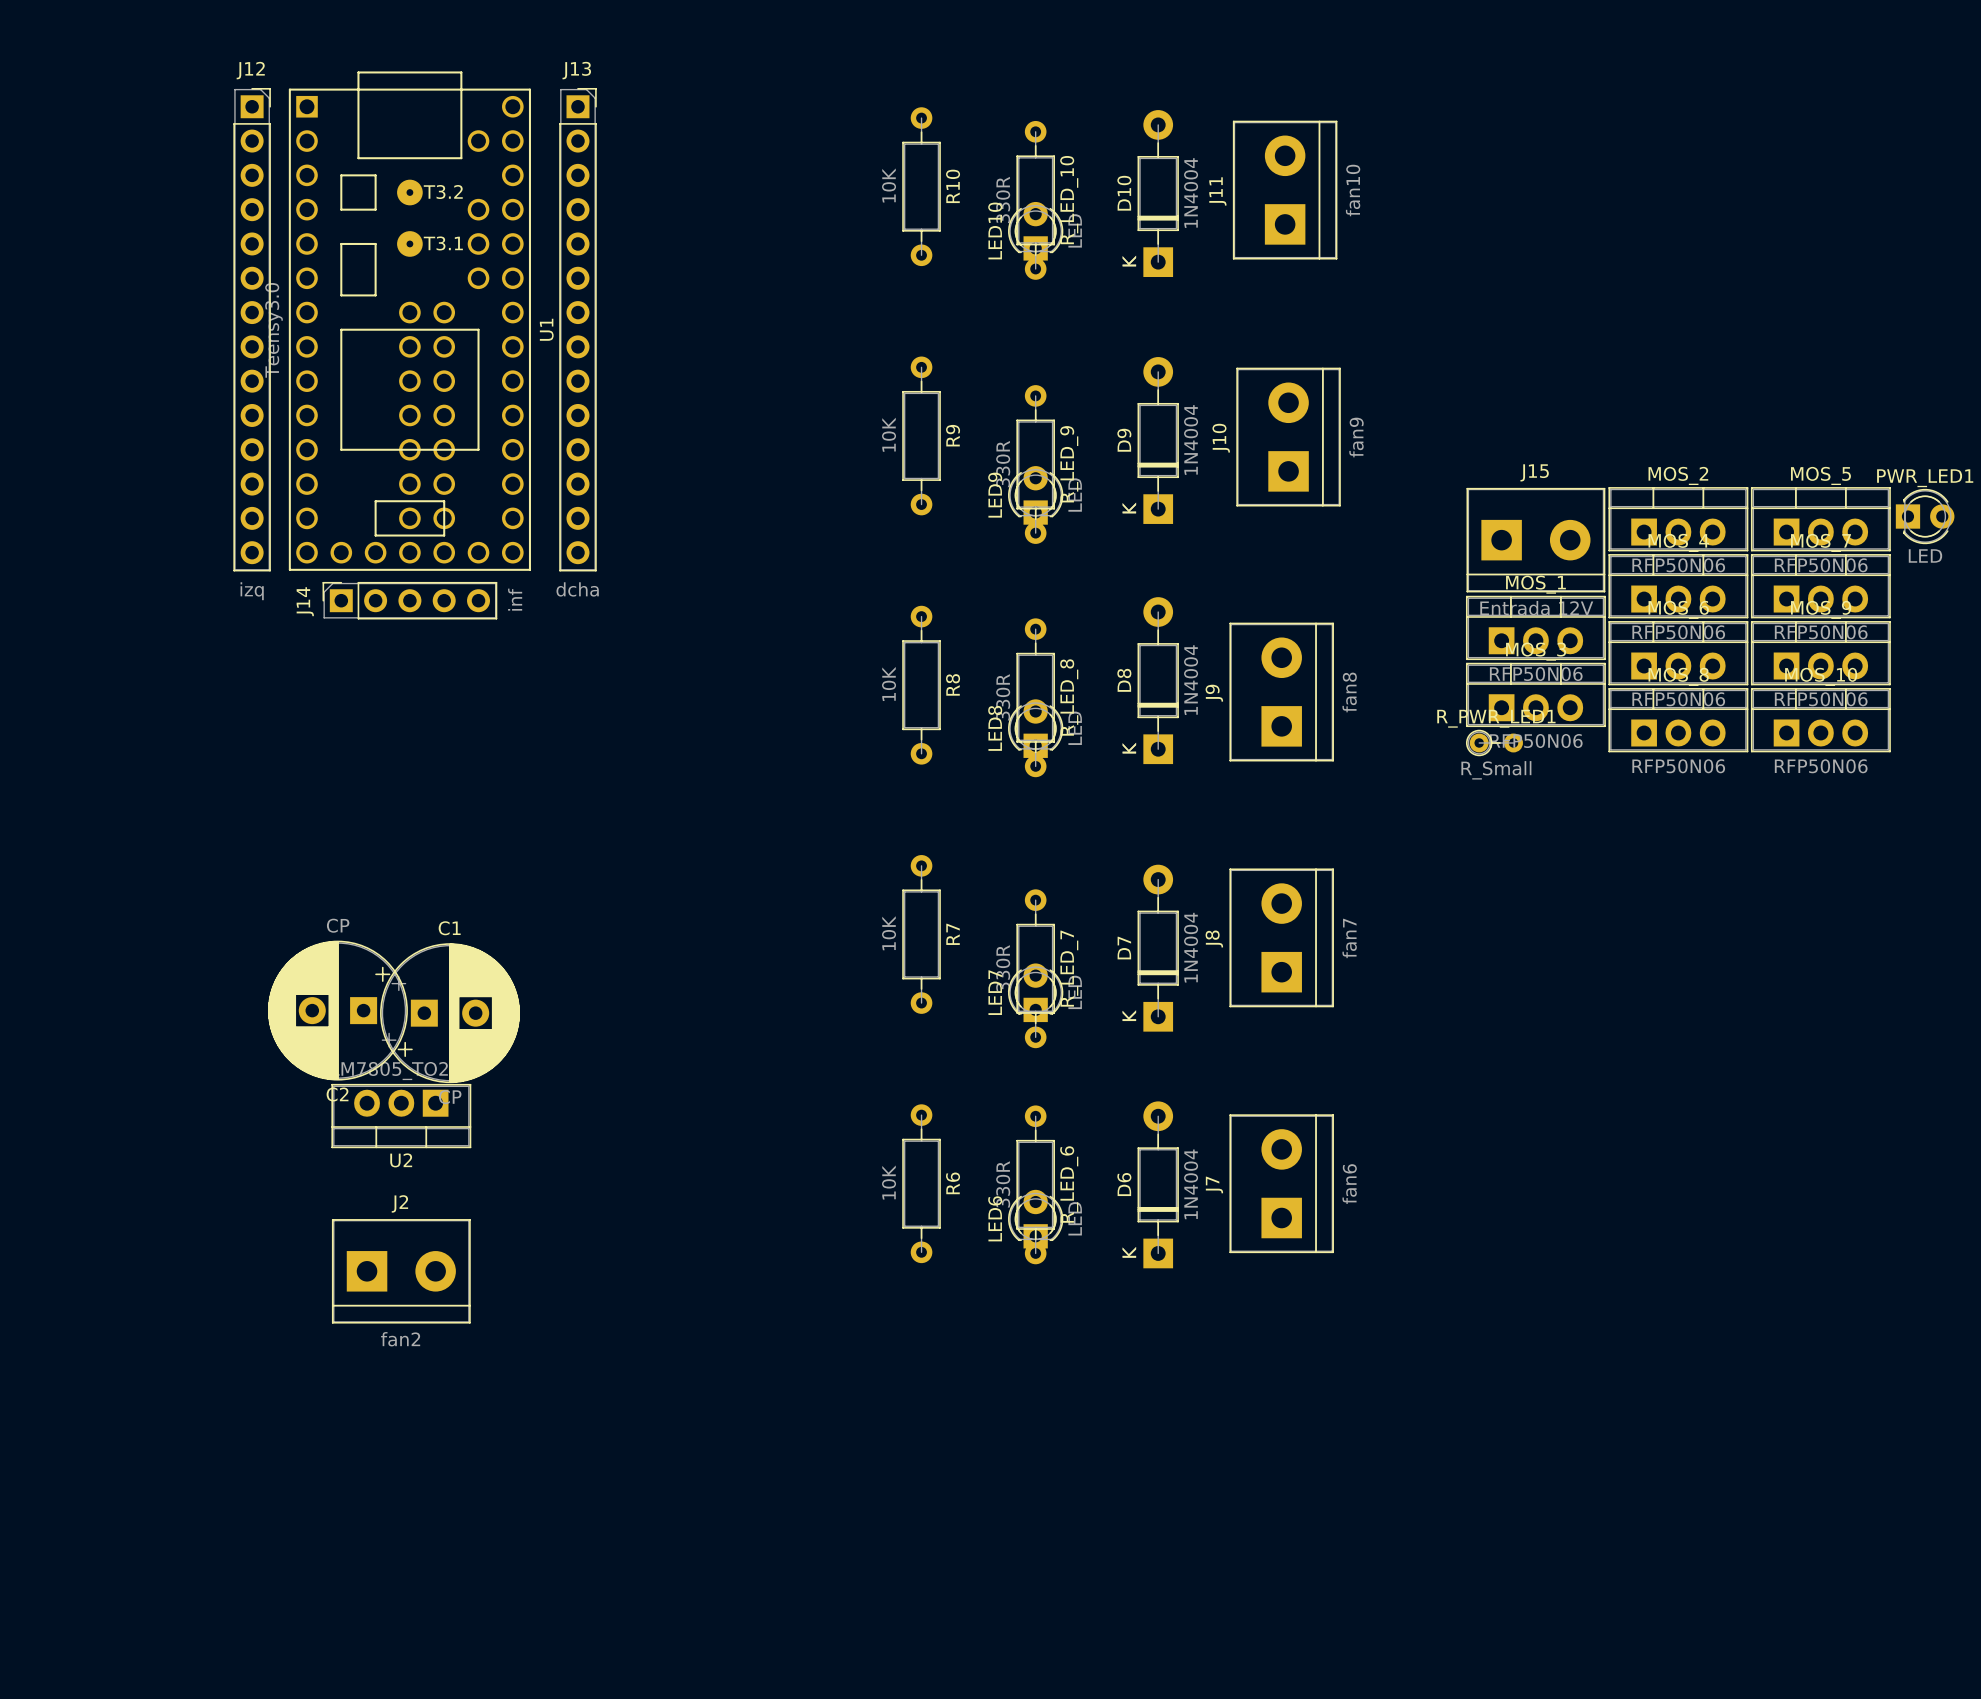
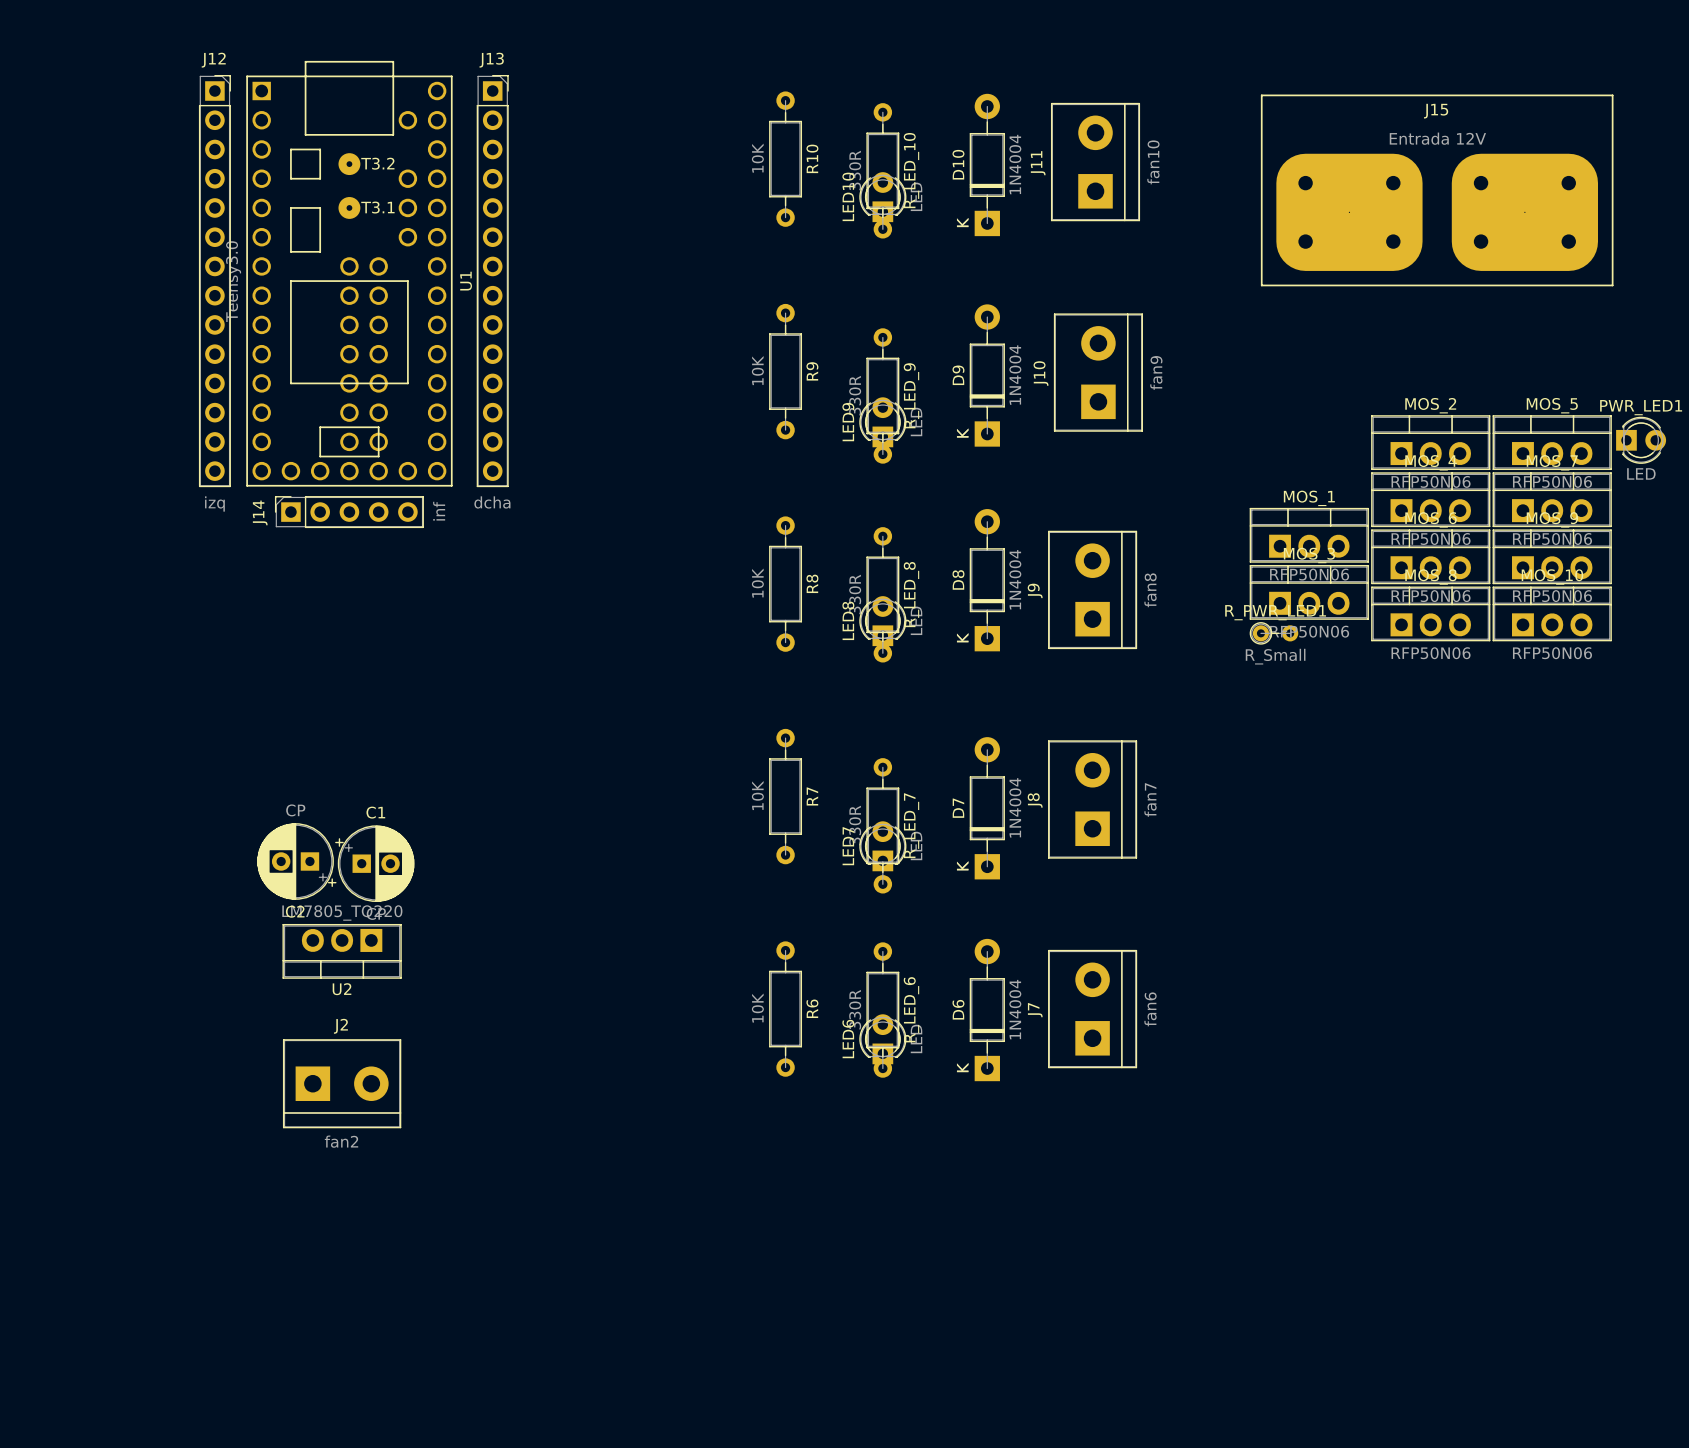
J15 footprint: [1466, 487, 1606, 593] -> [1260, 94, 1614, 287]
J15 value position: Entrada 12V (1536, 608) -> Entrada 12V (1437, 138)
C2 footprint: [267, 940, 413, 1081] -> [257, 823, 337, 900]
C1 footprint: [375, 943, 520, 1084] -> [335, 825, 415, 903]

